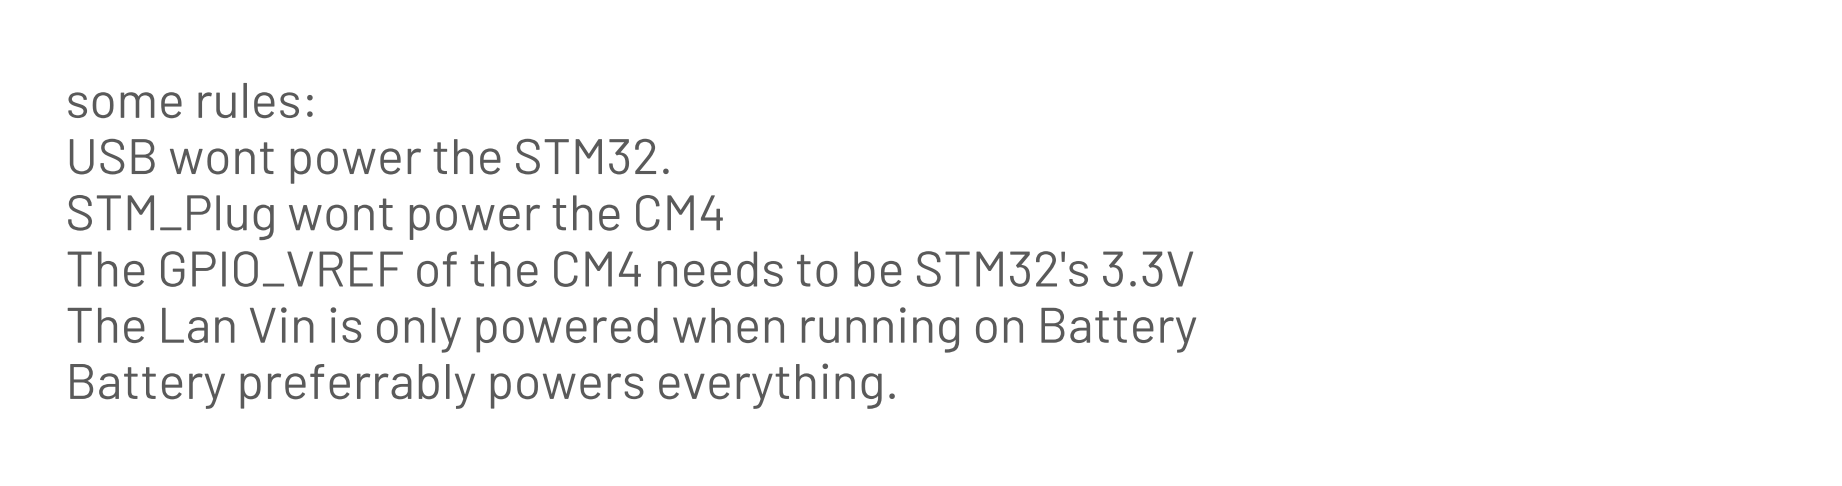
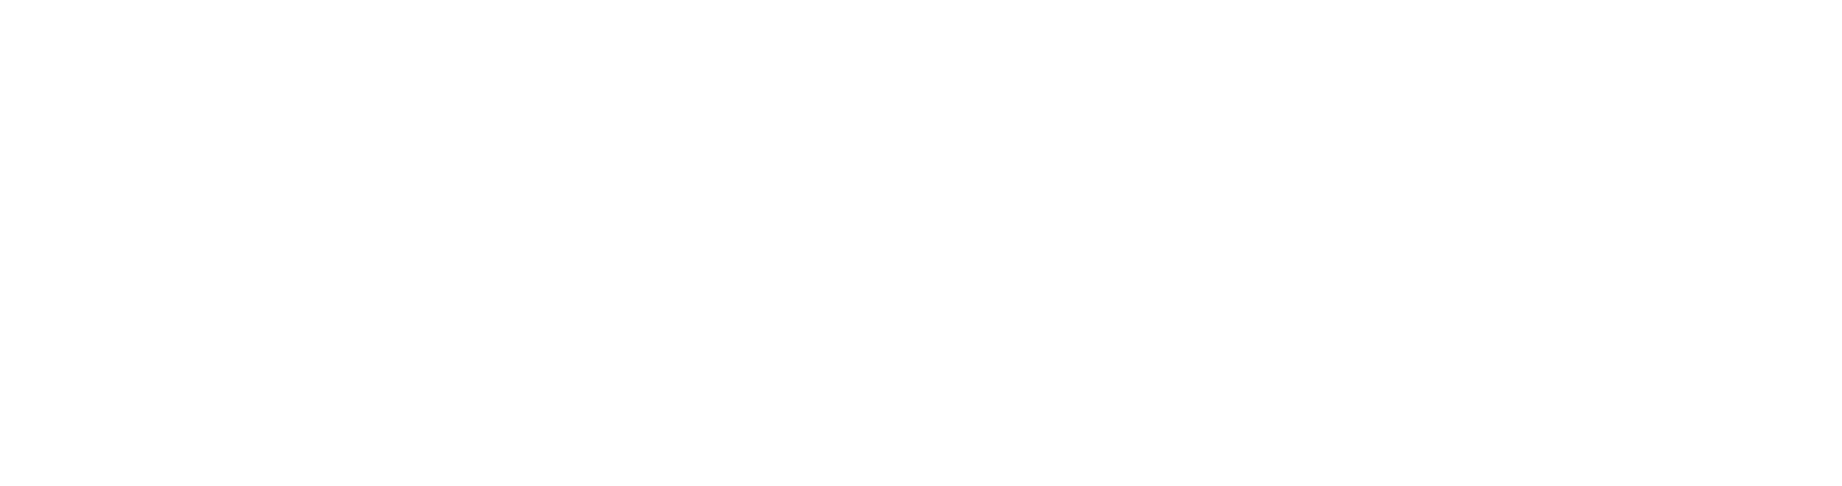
text: some rules: (190, 100) -> none
text: USB wont power the STM32. (369, 161) -> none
text: STM_Plug wont power the CM4 (395, 217) -> none
text: The GPIO_VREF of the CM4 needs to be STM32's 3.3V (630, 269) -> none
text: The Lan Vin is only powered when running on Battery (632, 329) -> none
text: Battery preferrably powers everything. (482, 386) -> none

